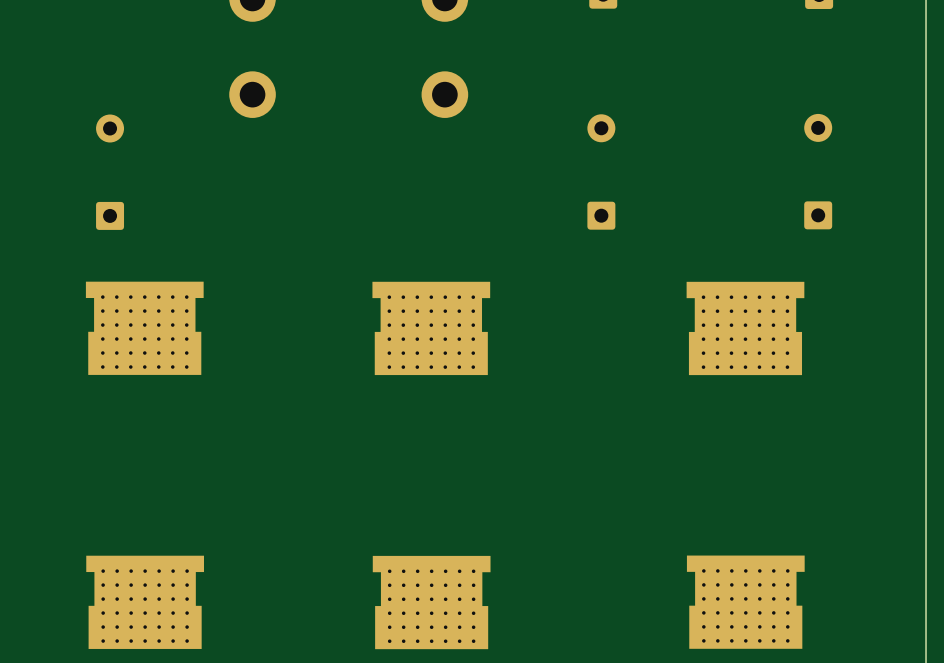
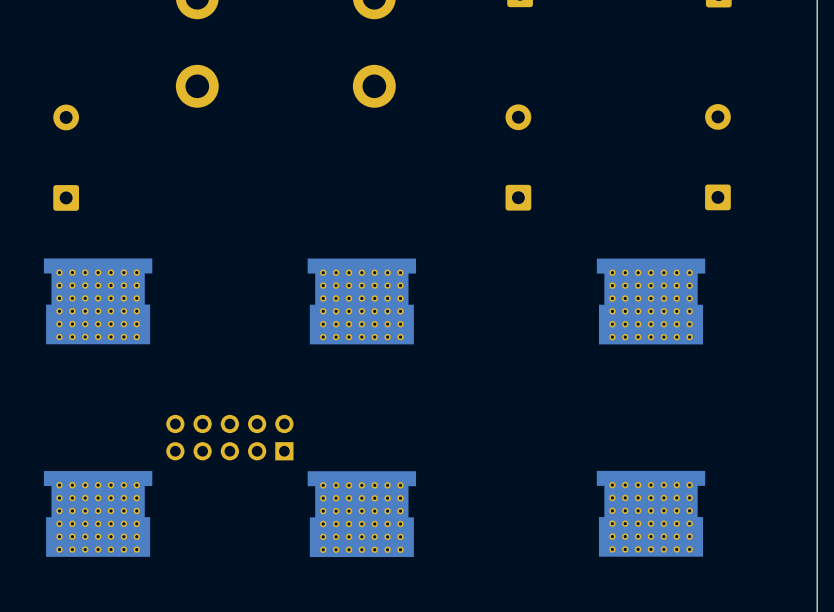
part: none -> (229, 437)
part position: (145, 602) -> (98, 513)
part position: (431, 602) -> (361, 514)
part position: (745, 602) -> (651, 513)

